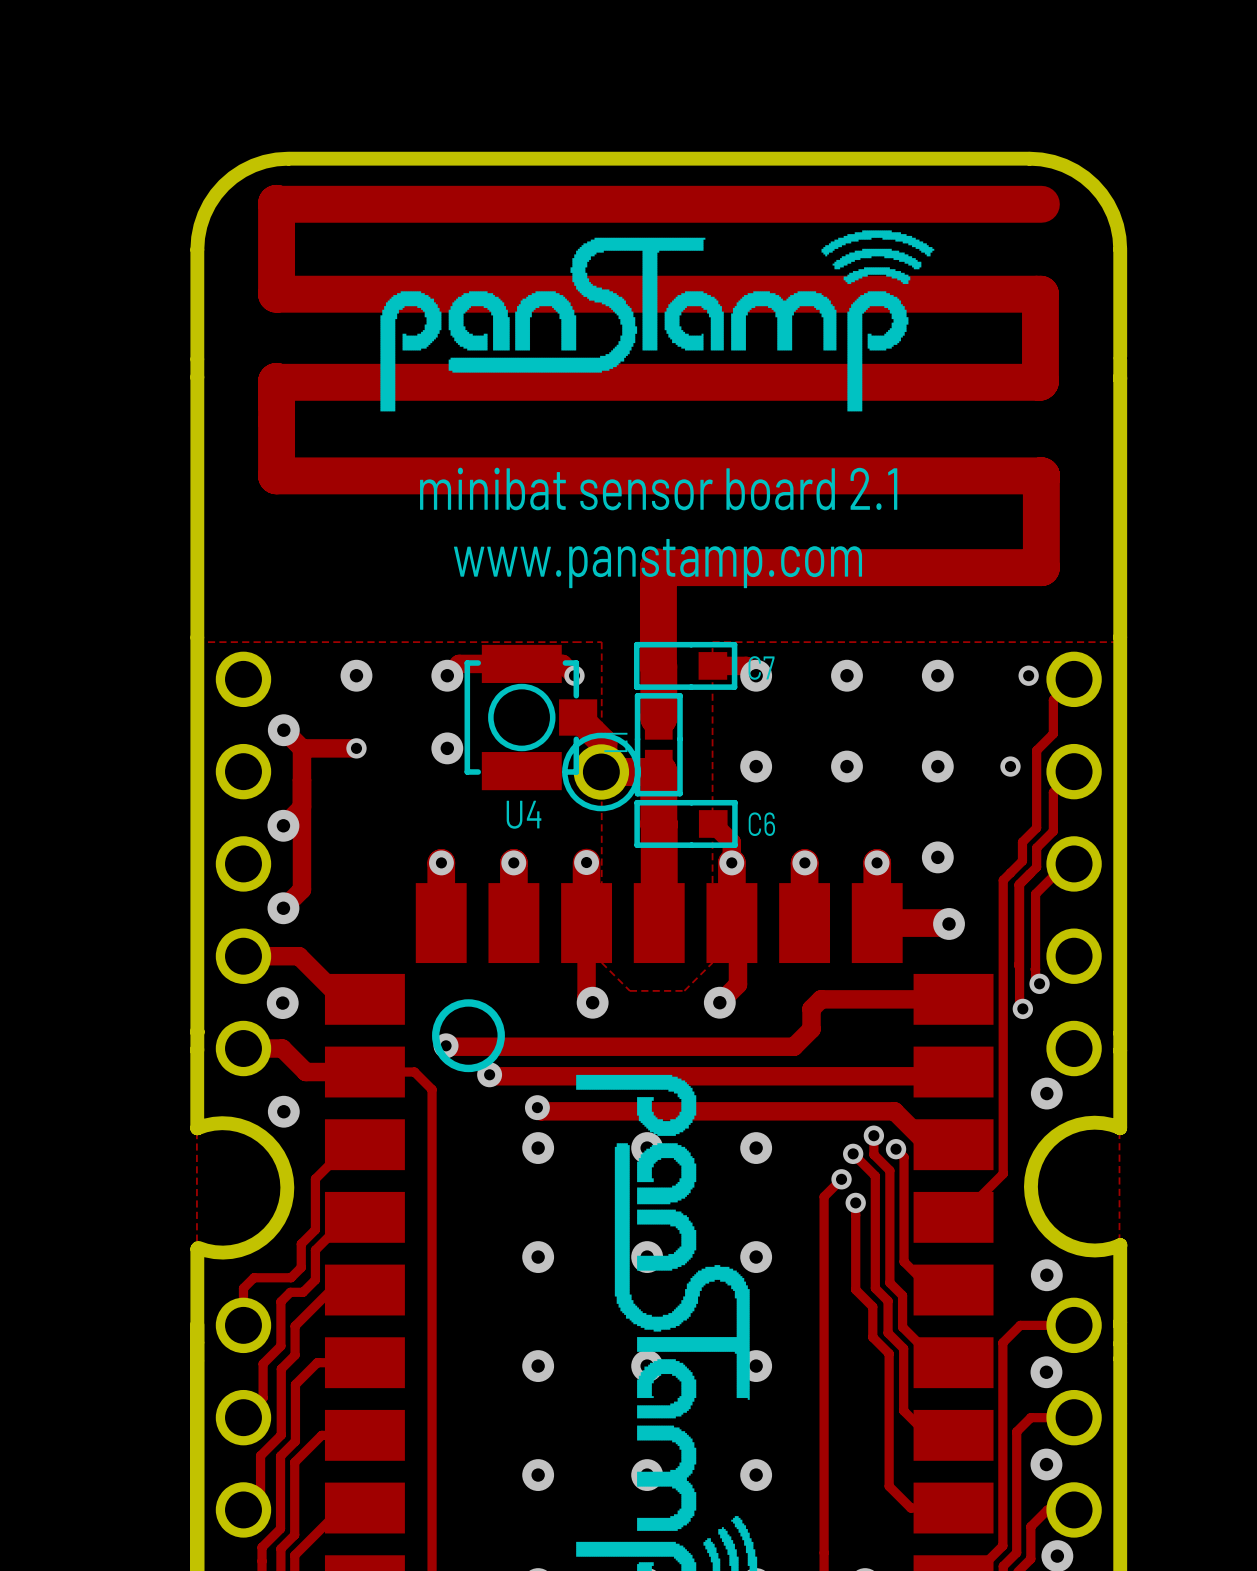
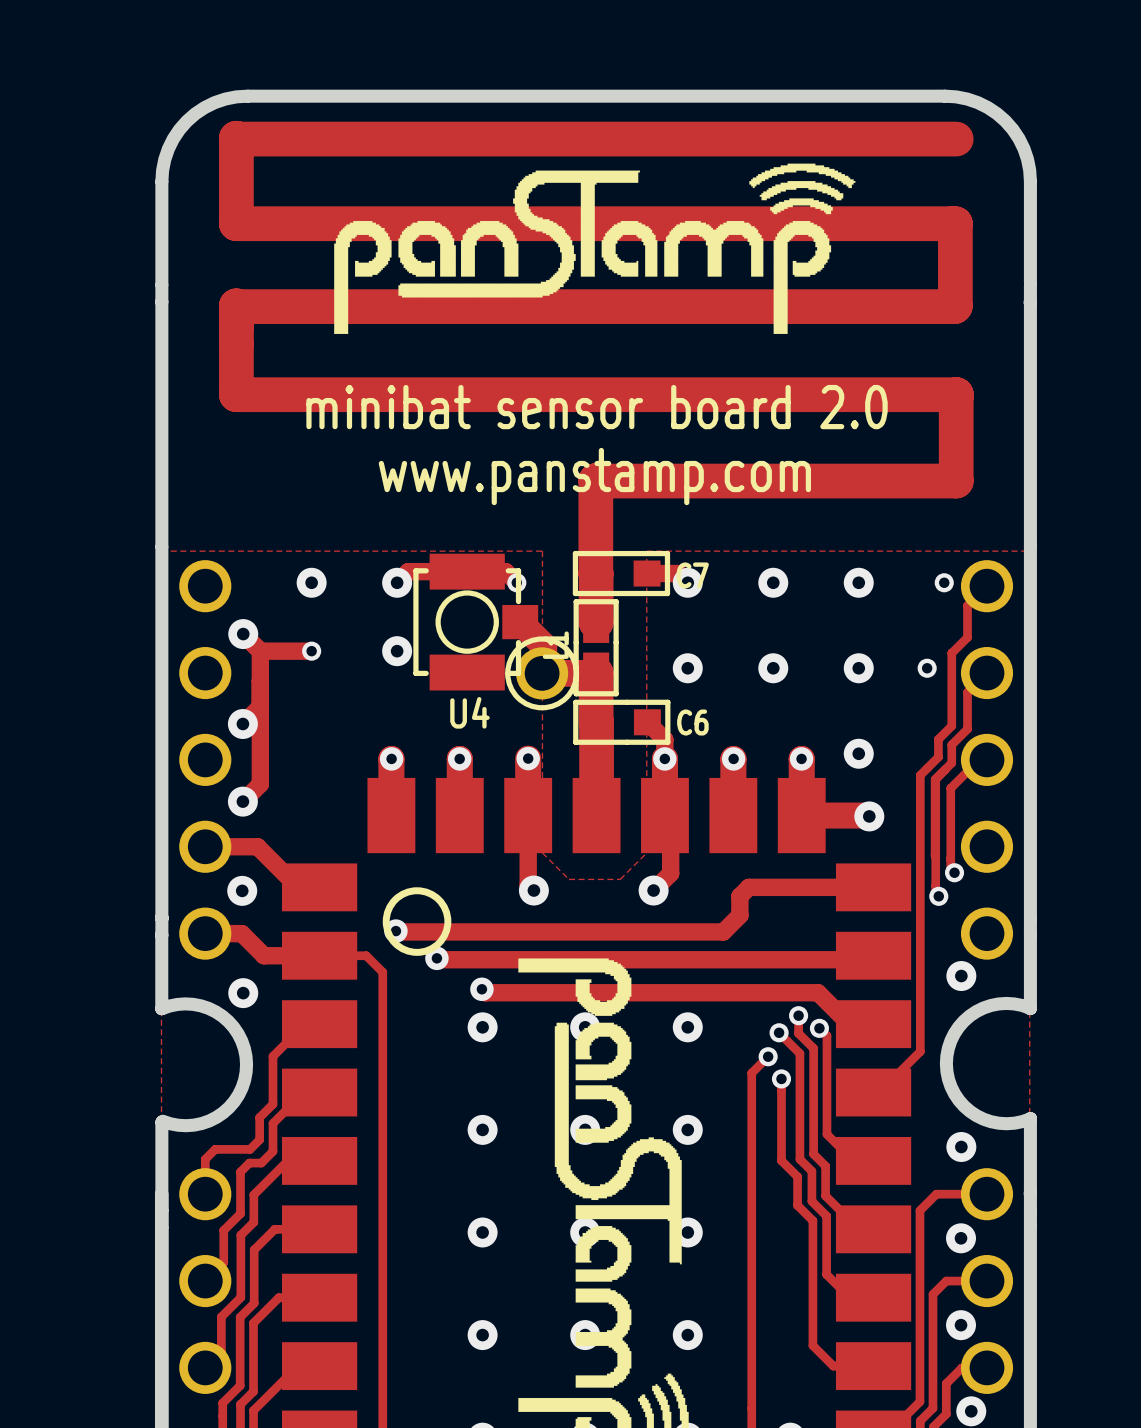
text: minibat sensor board 2.1 (658, 489) -> minibat sensor board 2.0 (597, 407)

